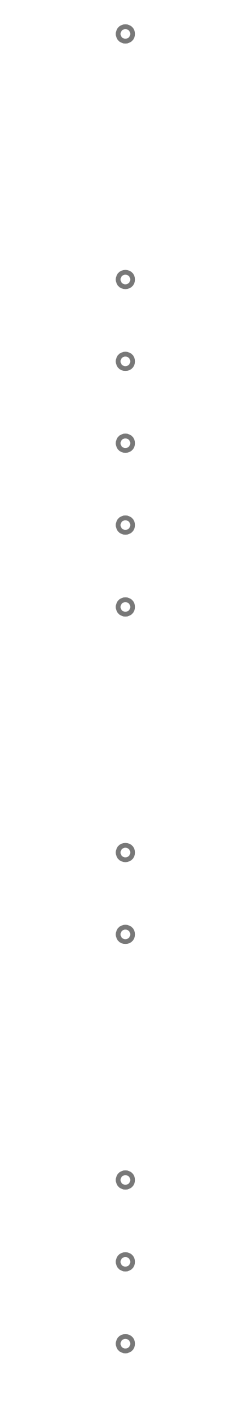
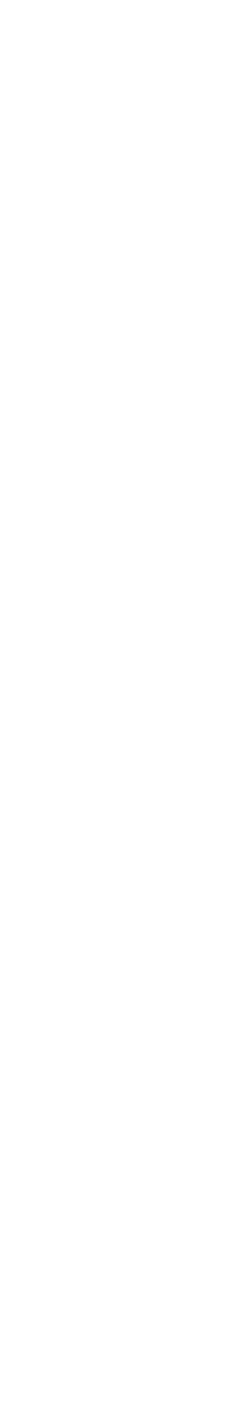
via: (125, 33) -> none
via: (125, 279) -> none
via: (125, 361) -> none
via: (125, 443) -> none
via: (125, 525) -> none
via: (125, 606) -> none
via: (125, 852) -> none
via: (125, 934) -> none
via: (125, 1179) -> none
via: (125, 1261) -> none
via: (125, 1343) -> none

